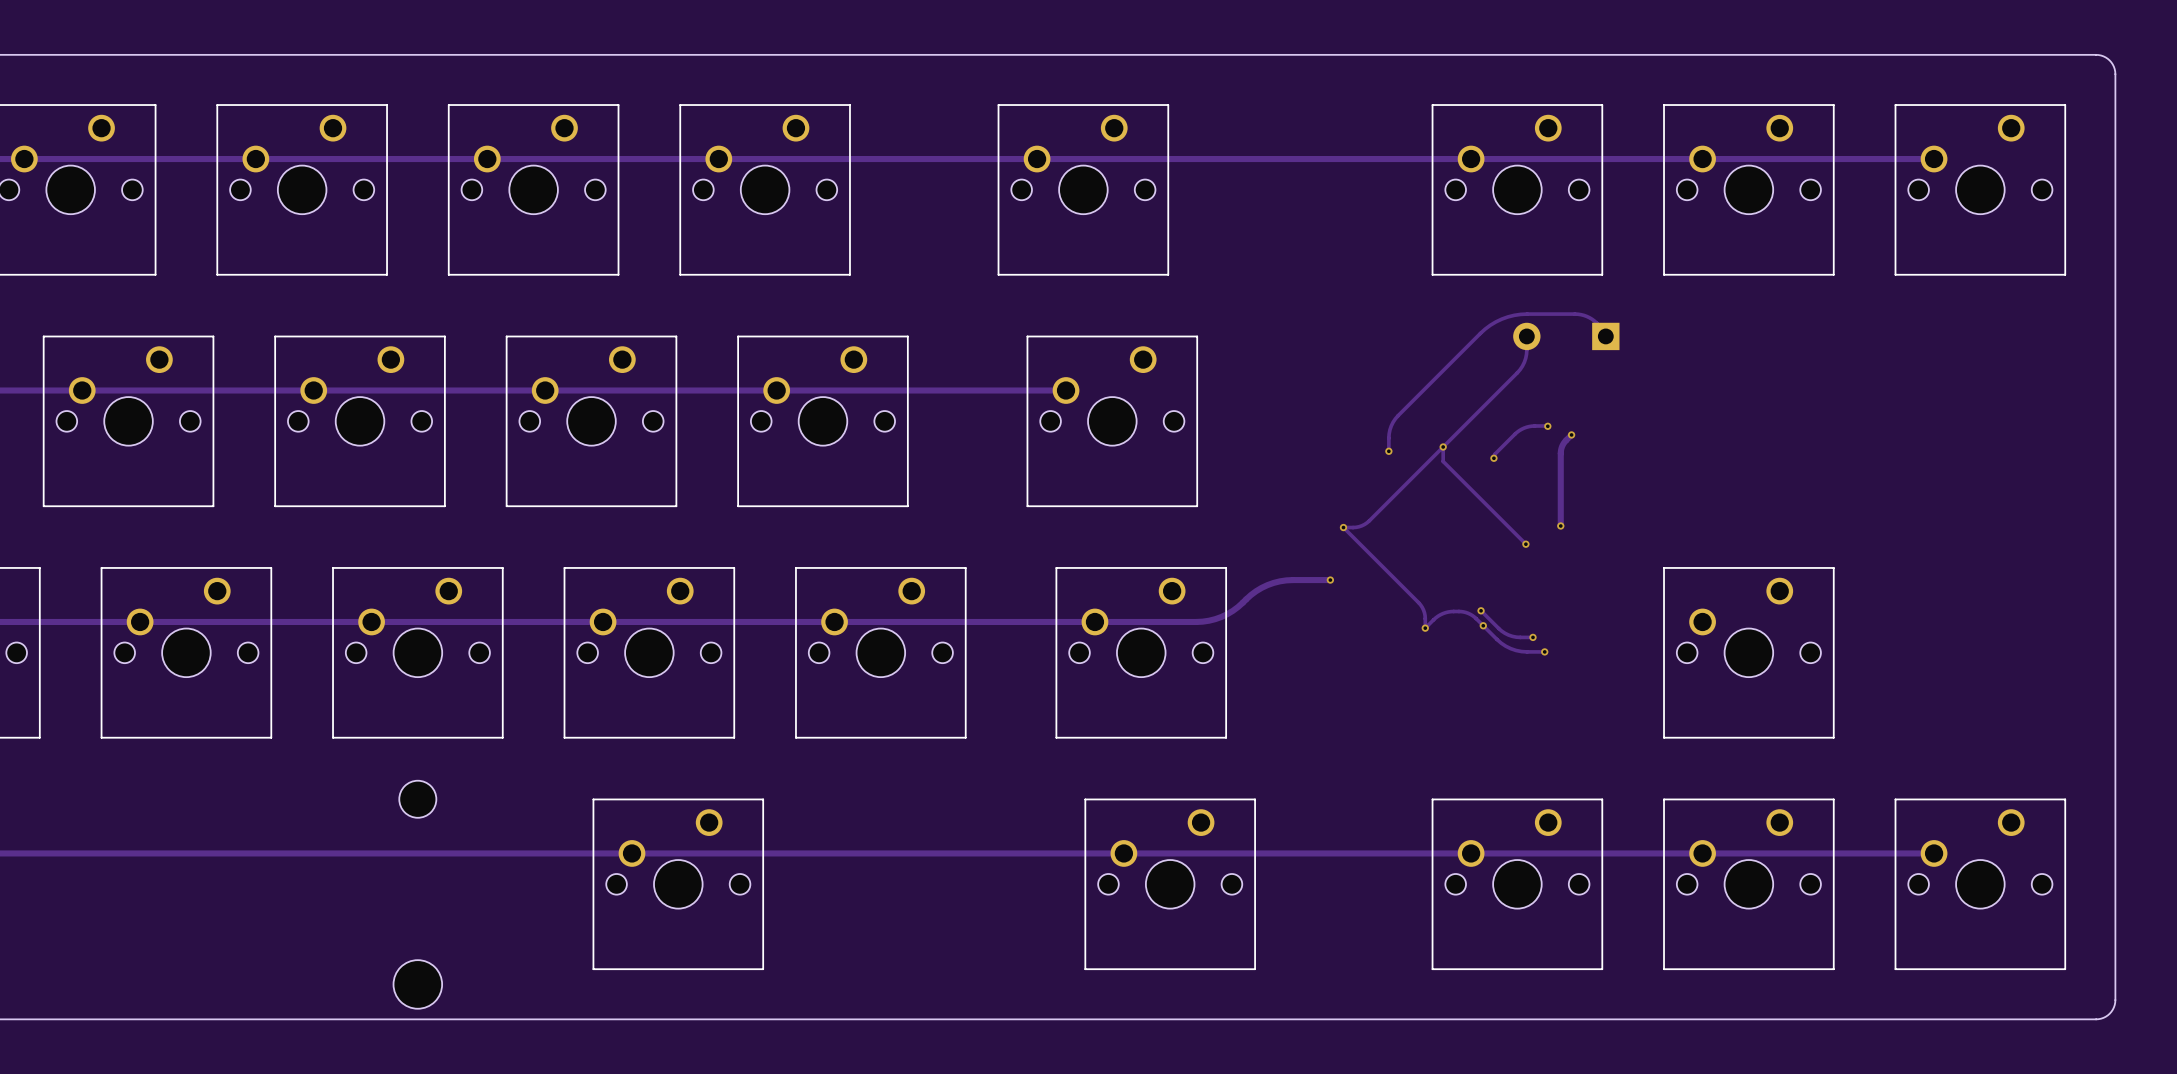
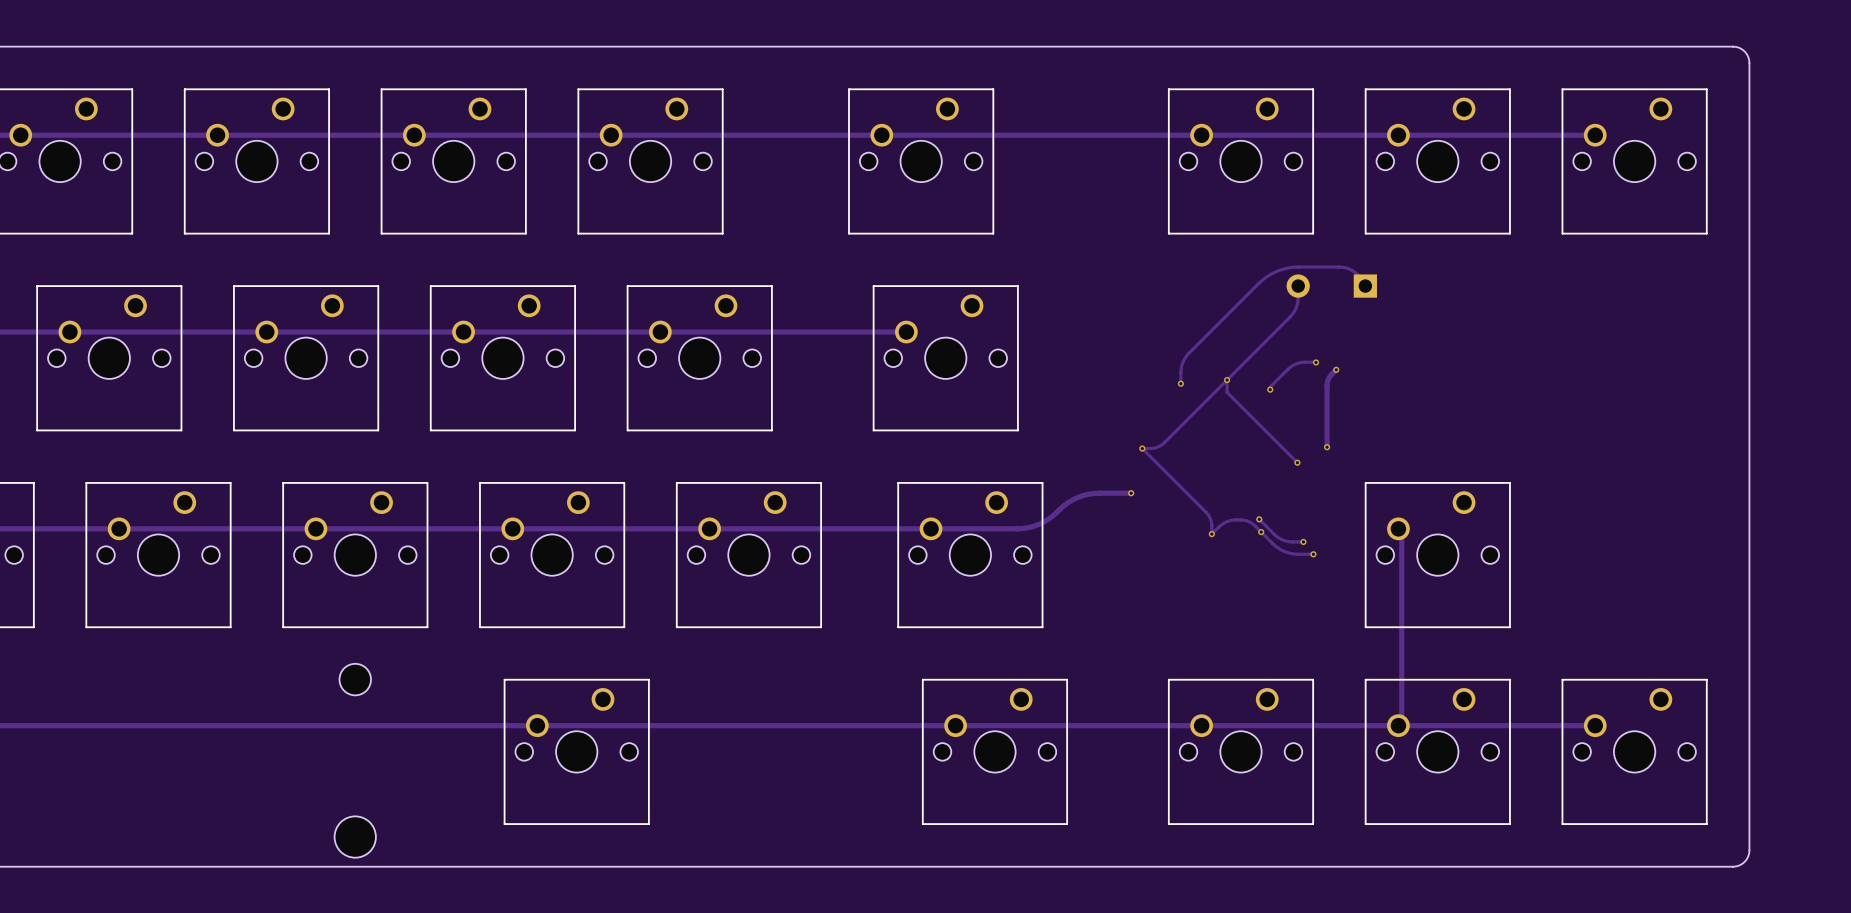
board edge: (2038, 54) (2101, 55) (2111, 62) (2115, 74) (2115, 1002) (2109, 1013) (2101, 1018) (2038, 1019) -> (1733, 46) (1744, 51) (1749, 63) (1749, 850) (1744, 861) (1733, 866)
track: (1876, 159) (1934, 159) -> none
part position: (1517, 189) -> (1240, 161)
part position: (1748, 189) -> (1437, 161)
part position: (1980, 189) -> (1634, 161)
track: none -> (1398, 528) (1401, 532) (1401, 722) (1398, 725)
part position: (1748, 652) -> (1437, 555)
track: (1876, 853) (1934, 853) -> none
part position: (1517, 884) -> (1240, 751)
part position: (1748, 884) -> (1437, 751)
part position: (1980, 884) -> (1634, 751)

